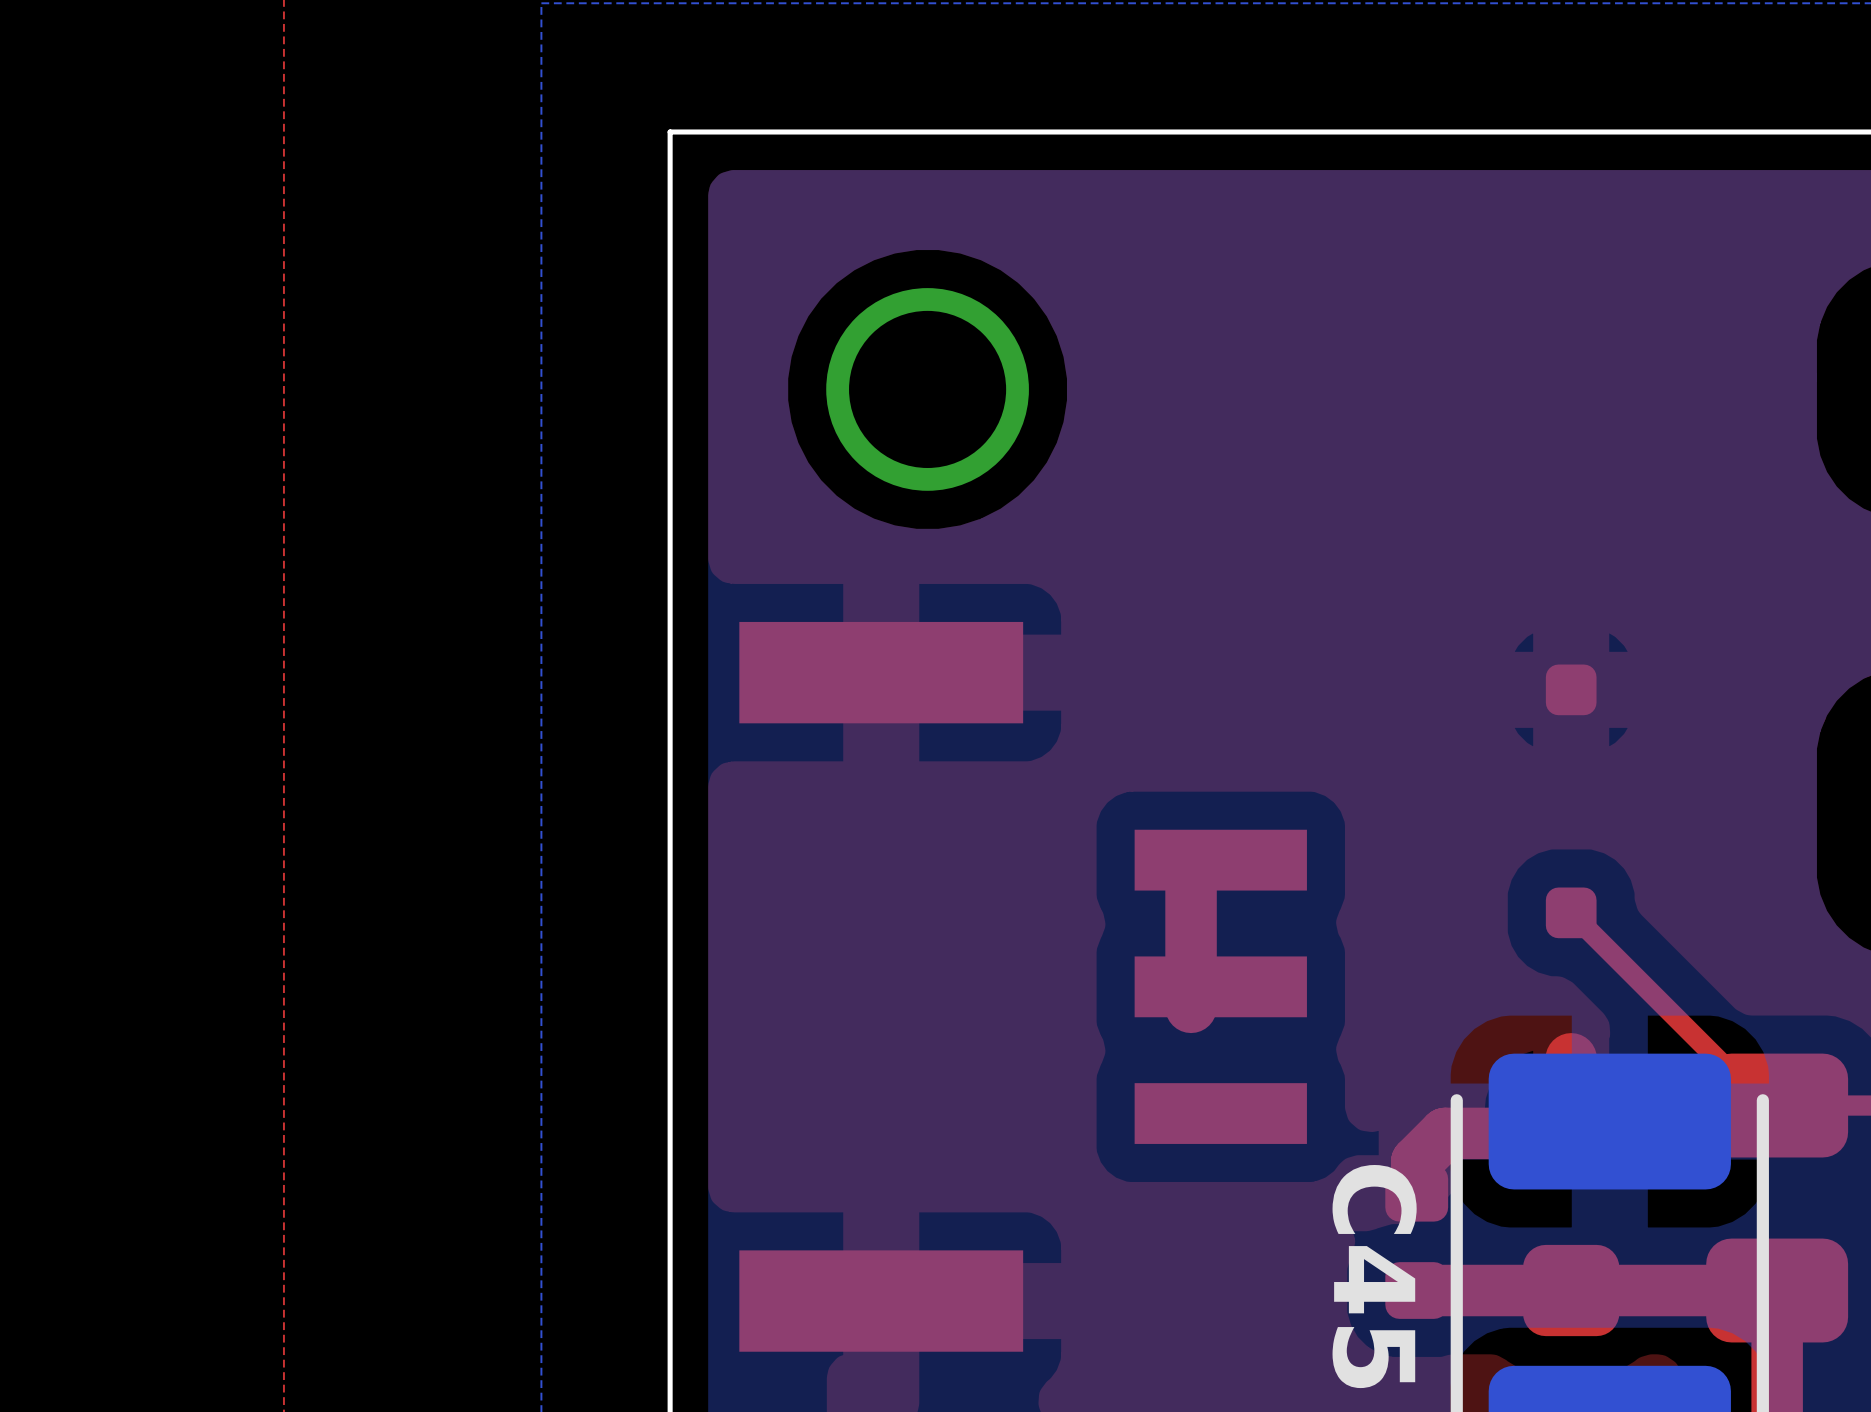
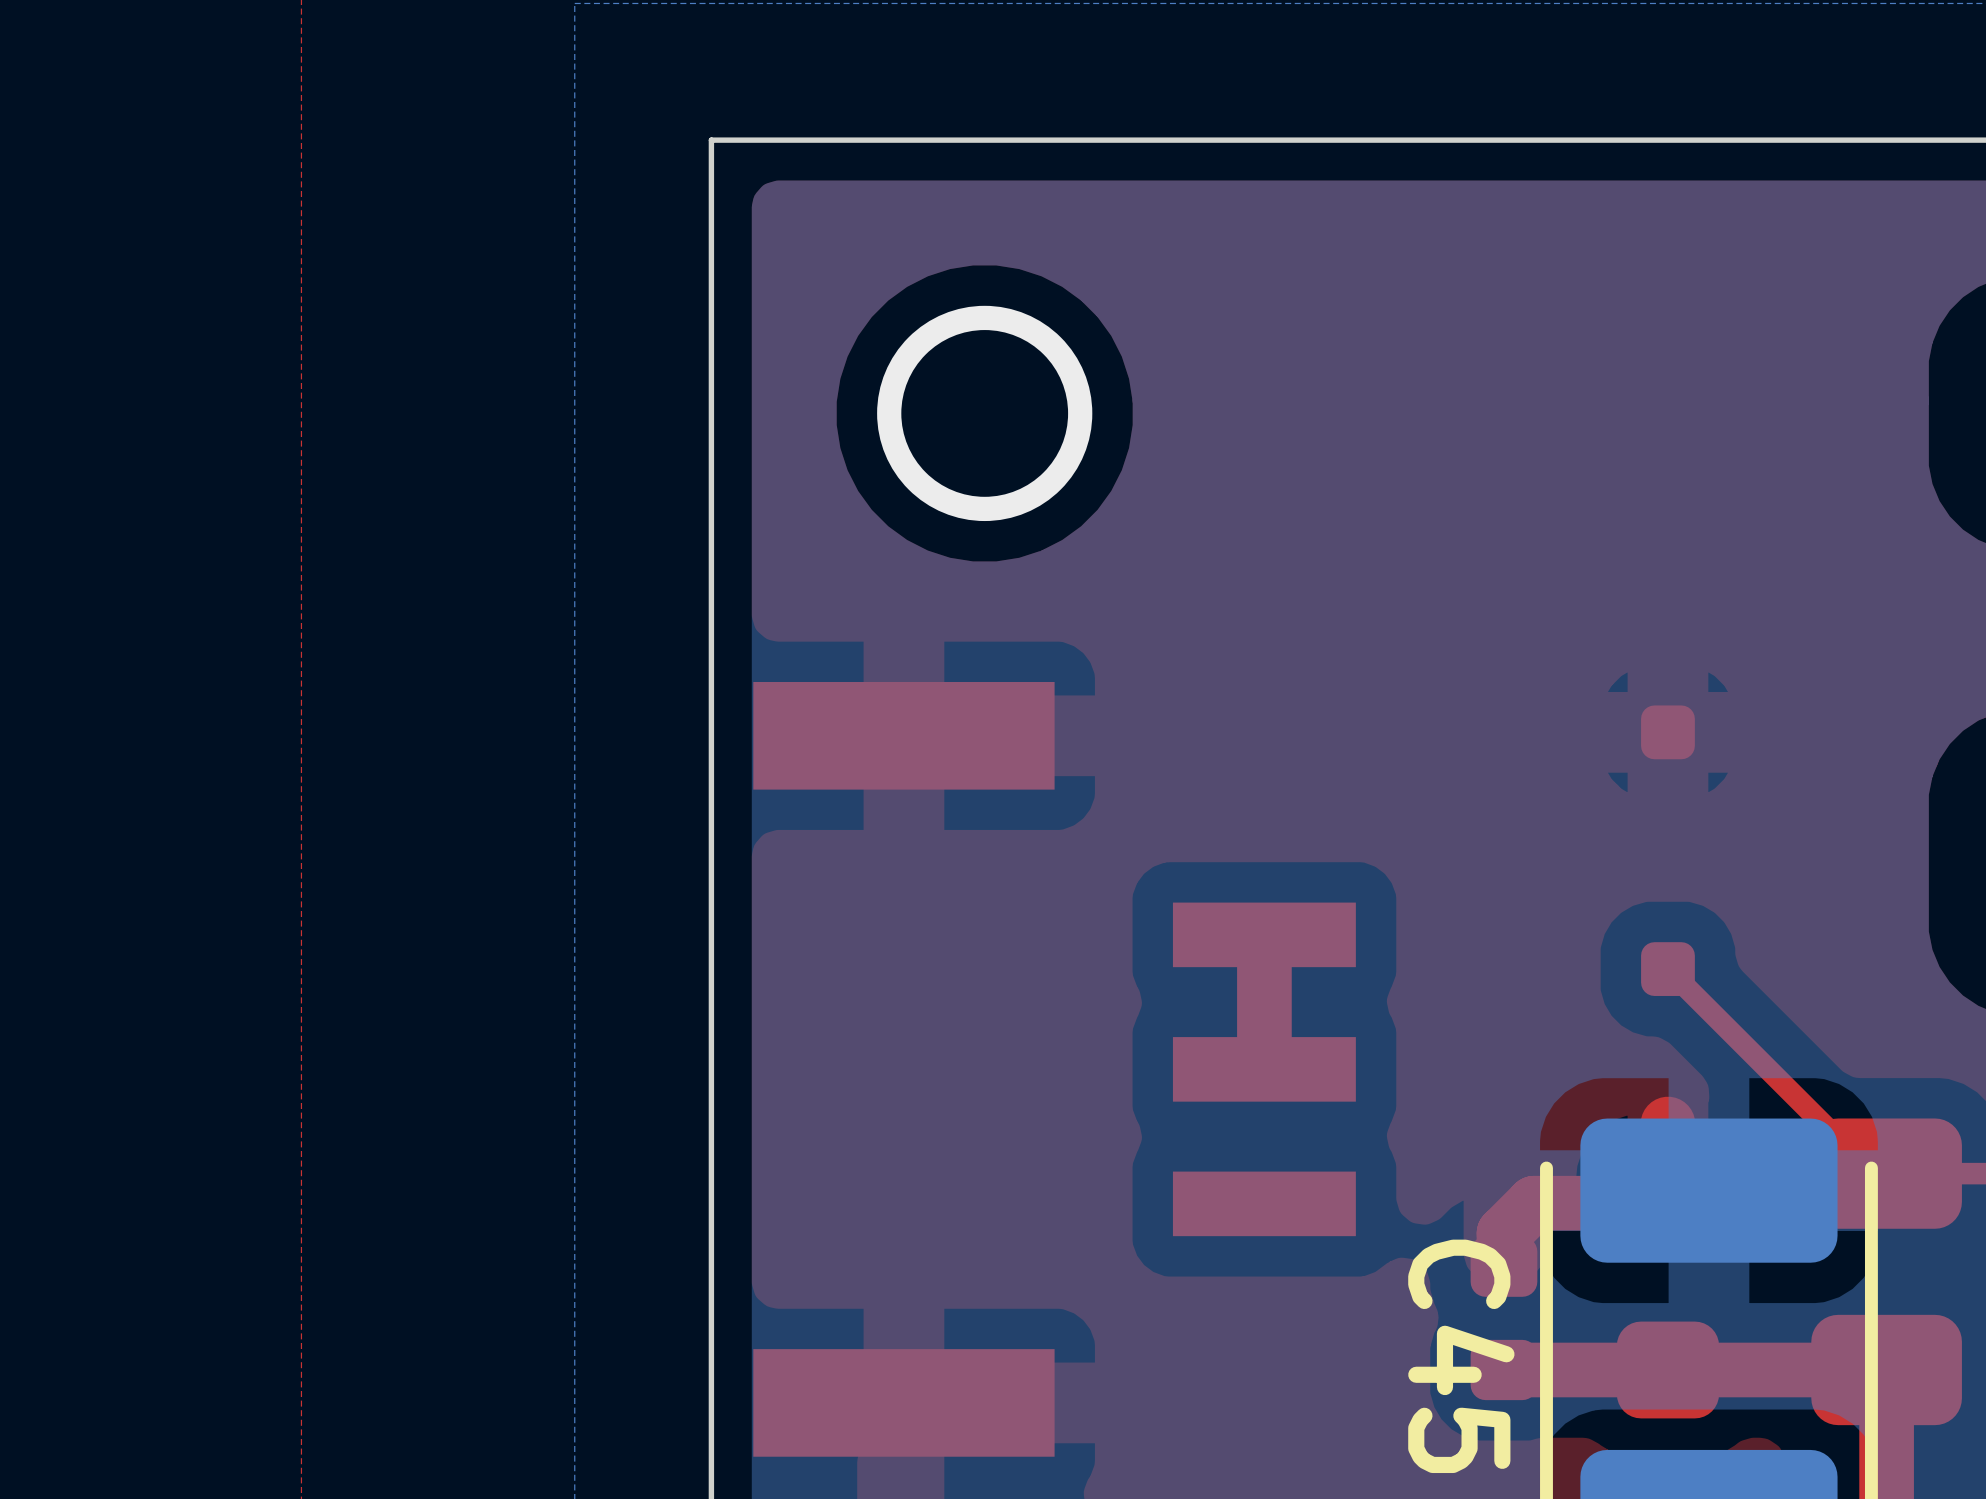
part position: (1023, 986) -> (1054, 1069)

